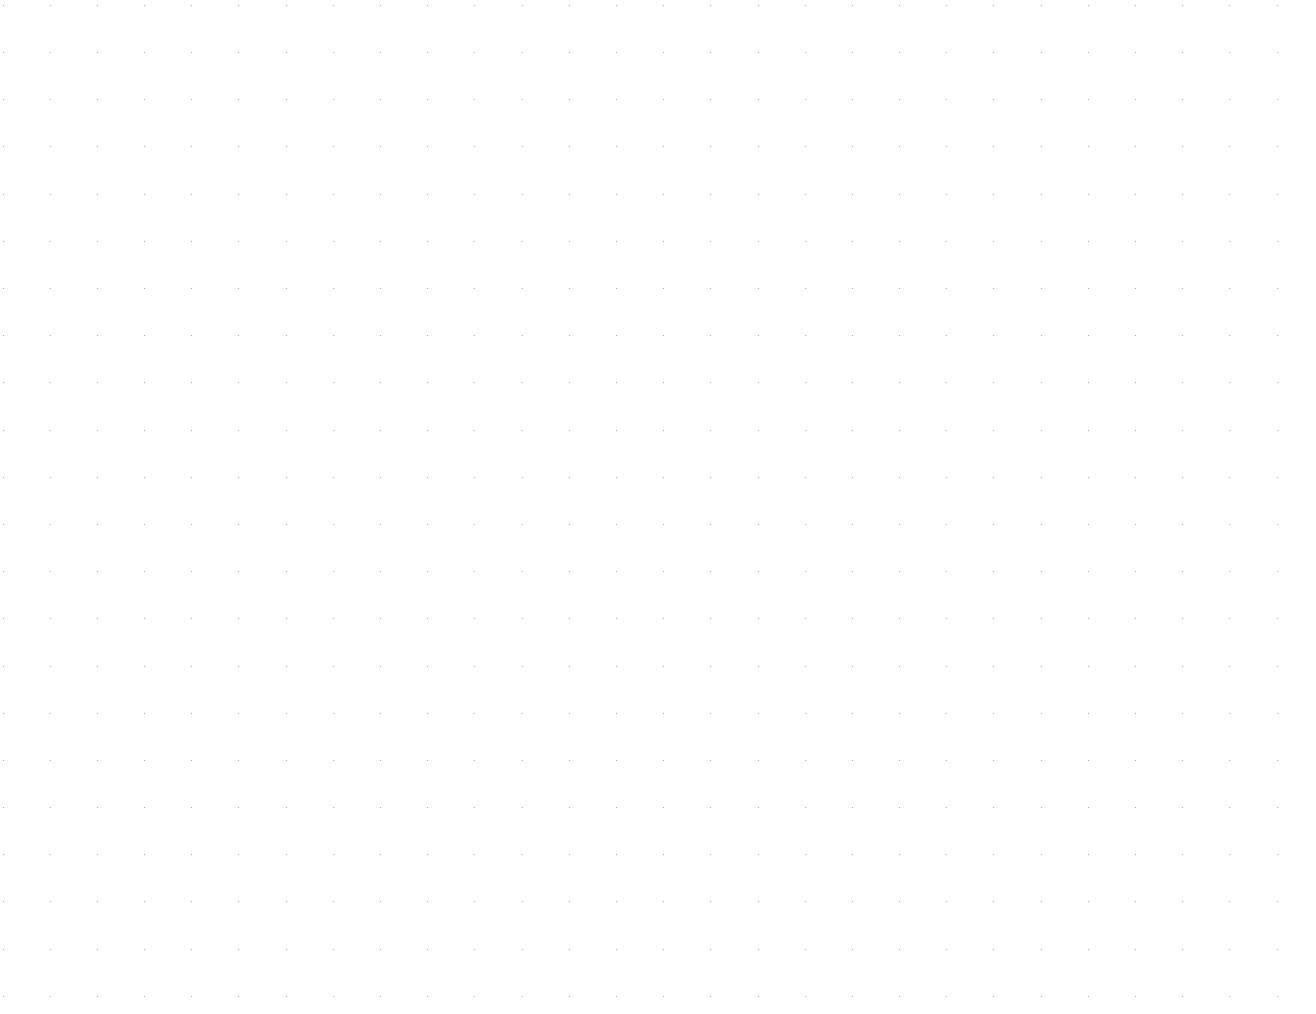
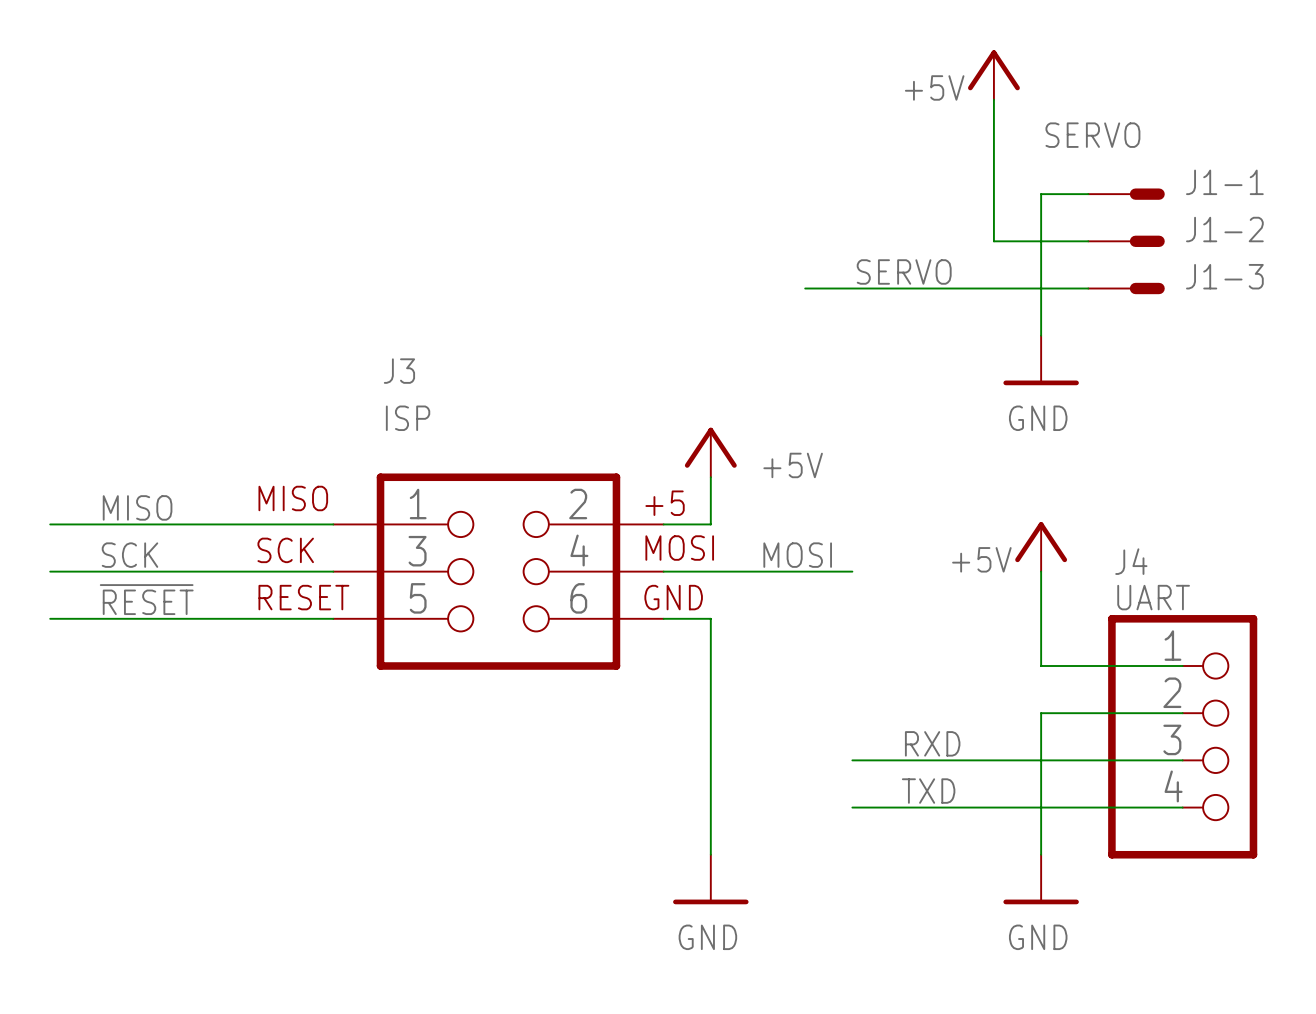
power symbol: none -> +5V (993, 74)
wire: none -> (993, 99) (993, 241) (1088, 241)
wire: none -> (1088, 194) (1041, 194) (1041, 335)
J1-1: none -> SERVO (1126, 194)
J1-2: none -> (1126, 241)
label: none -> SERVO (904, 271)
wire: none -> (805, 288) (1088, 288)
J1-3: none -> (1126, 288)
power symbol: none -> GND (1041, 360)
power symbol: none -> +5V (710, 452)
wire: none -> (710, 477) (710, 524) (663, 524)
label: none -> MISO (137, 507)
wire: none -> (50, 524) (333, 524)
power symbol: none -> +5V (1041, 546)
label: none -> SCK (129, 555)
label: none -> MOSI (797, 555)
wire: none -> (50, 571) (333, 571)
J3: none -> ISP (498, 571)
wire: none -> (663, 571) (852, 571)
wire: none -> (1041, 571) (1041, 666) (1182, 666)
label: none -> ~{RESET} (146, 599)
wire: none -> (50, 618) (333, 618)
wire: none -> (663, 618) (710, 618) (710, 854)
wire: none -> (1182, 713) (1041, 713) (1041, 854)
J4: none -> UART (1182, 736)
label: none -> RXD (932, 743)
wire: none -> (852, 760) (1182, 760)
label: none -> TXD (928, 791)
wire: none -> (852, 807) (1182, 807)
power symbol: none -> GND (710, 879)
power symbol: none -> GND (1041, 879)

